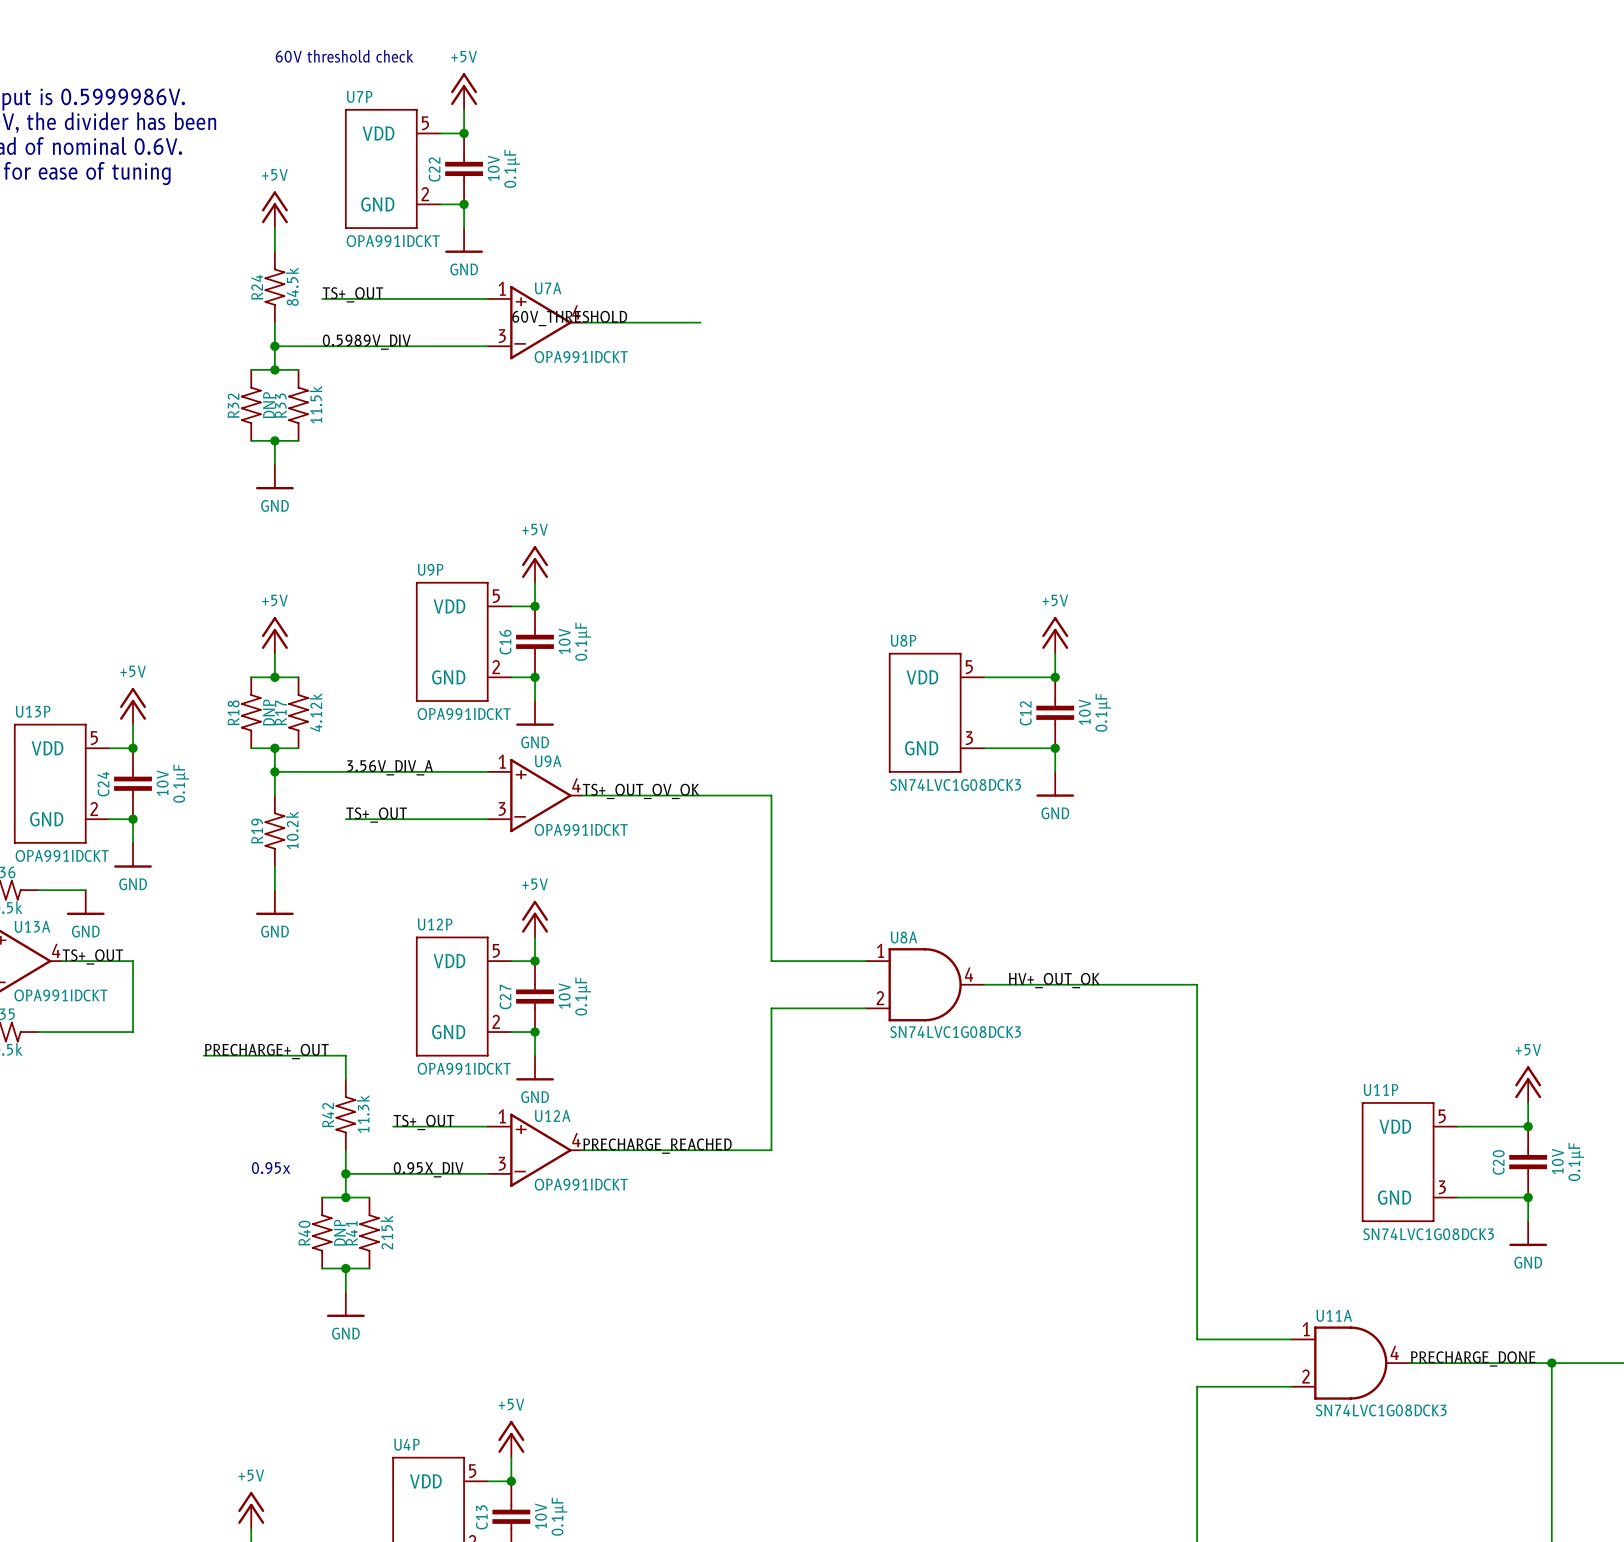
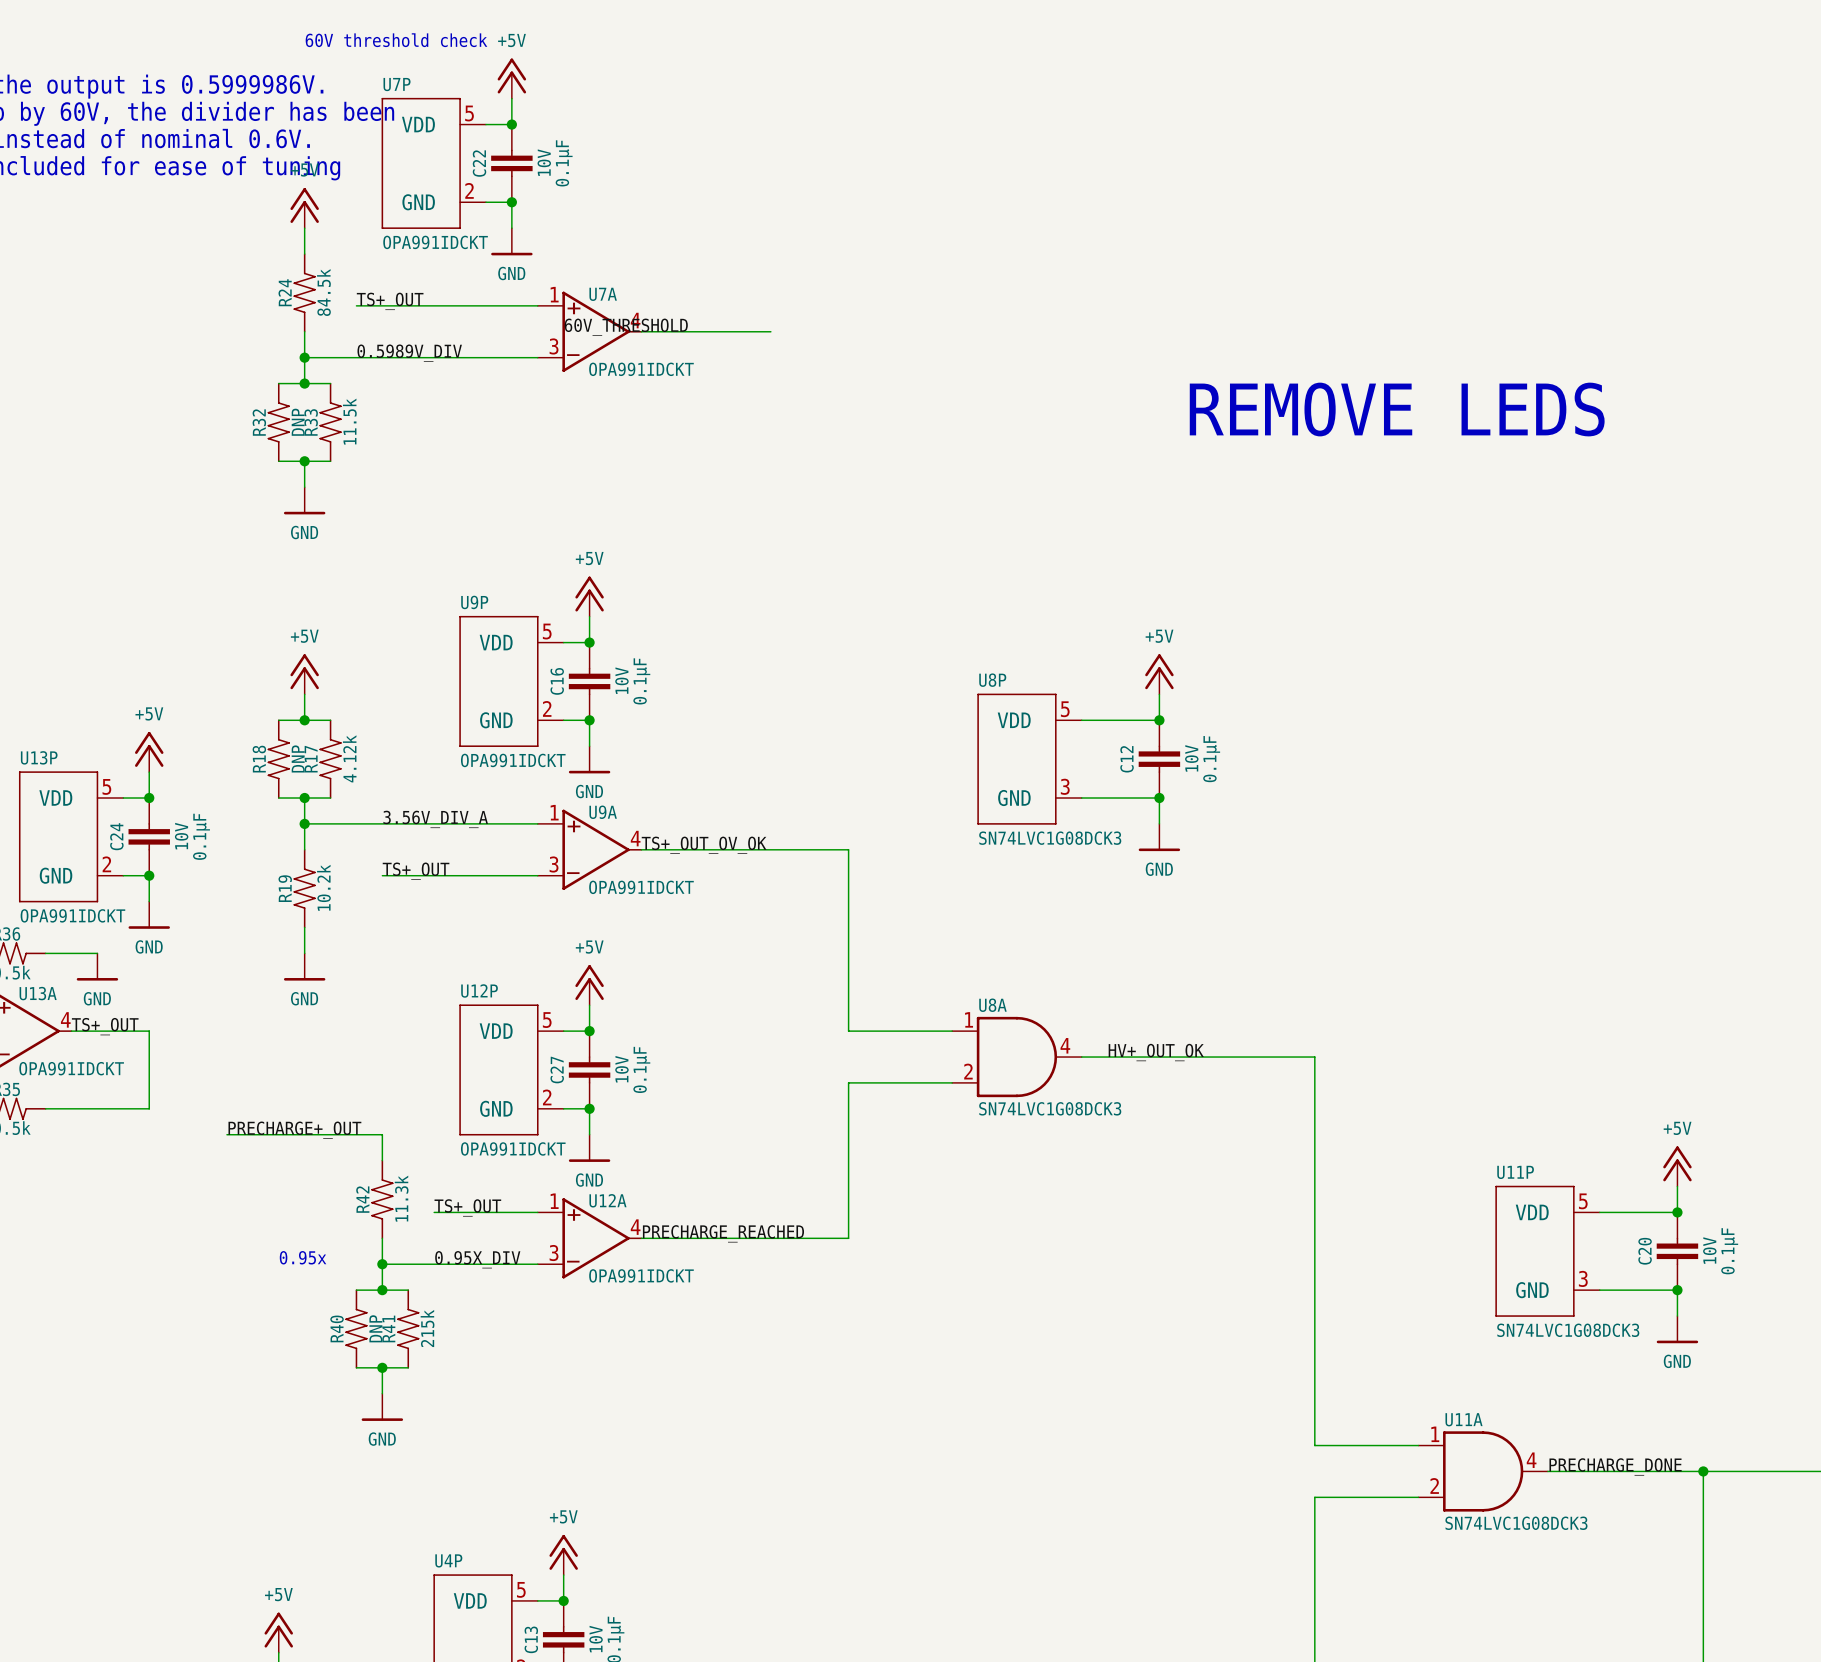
text: none -> REMOVE LEDS (1397, 409)

